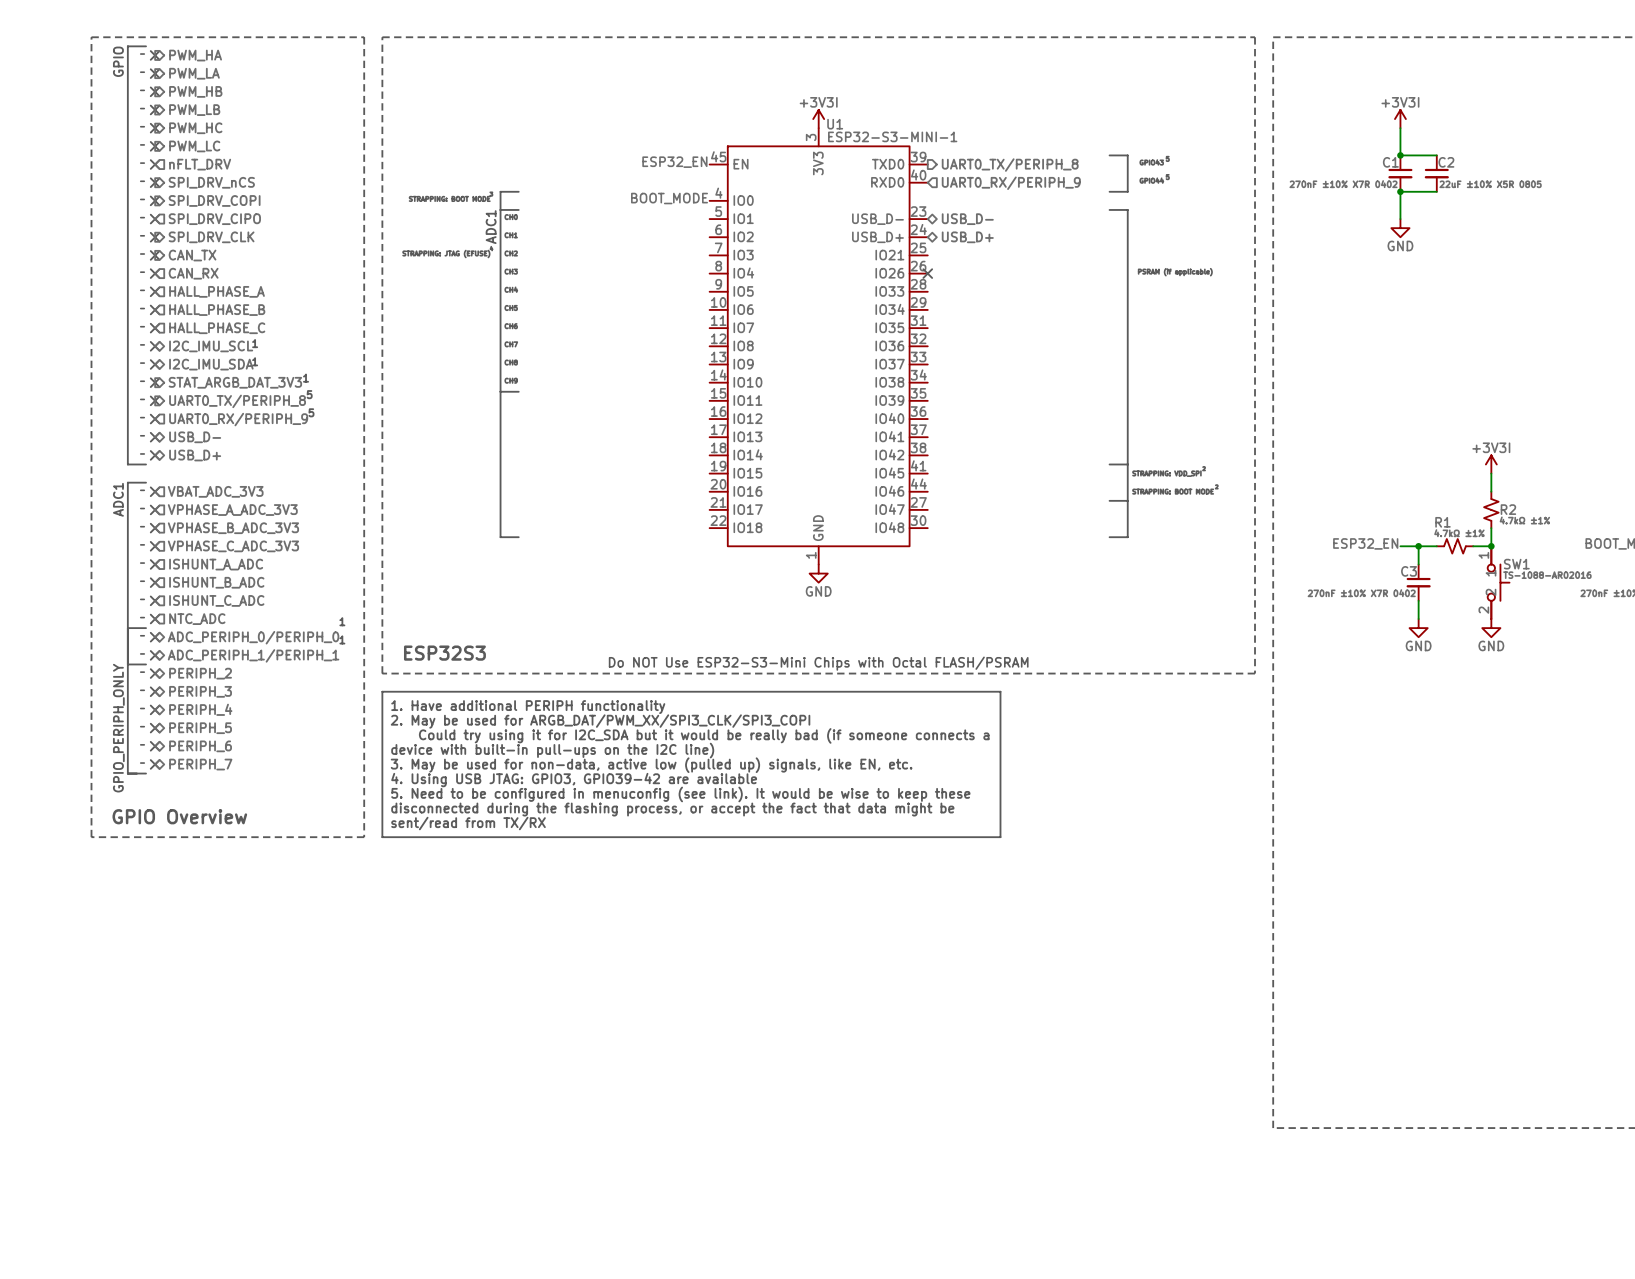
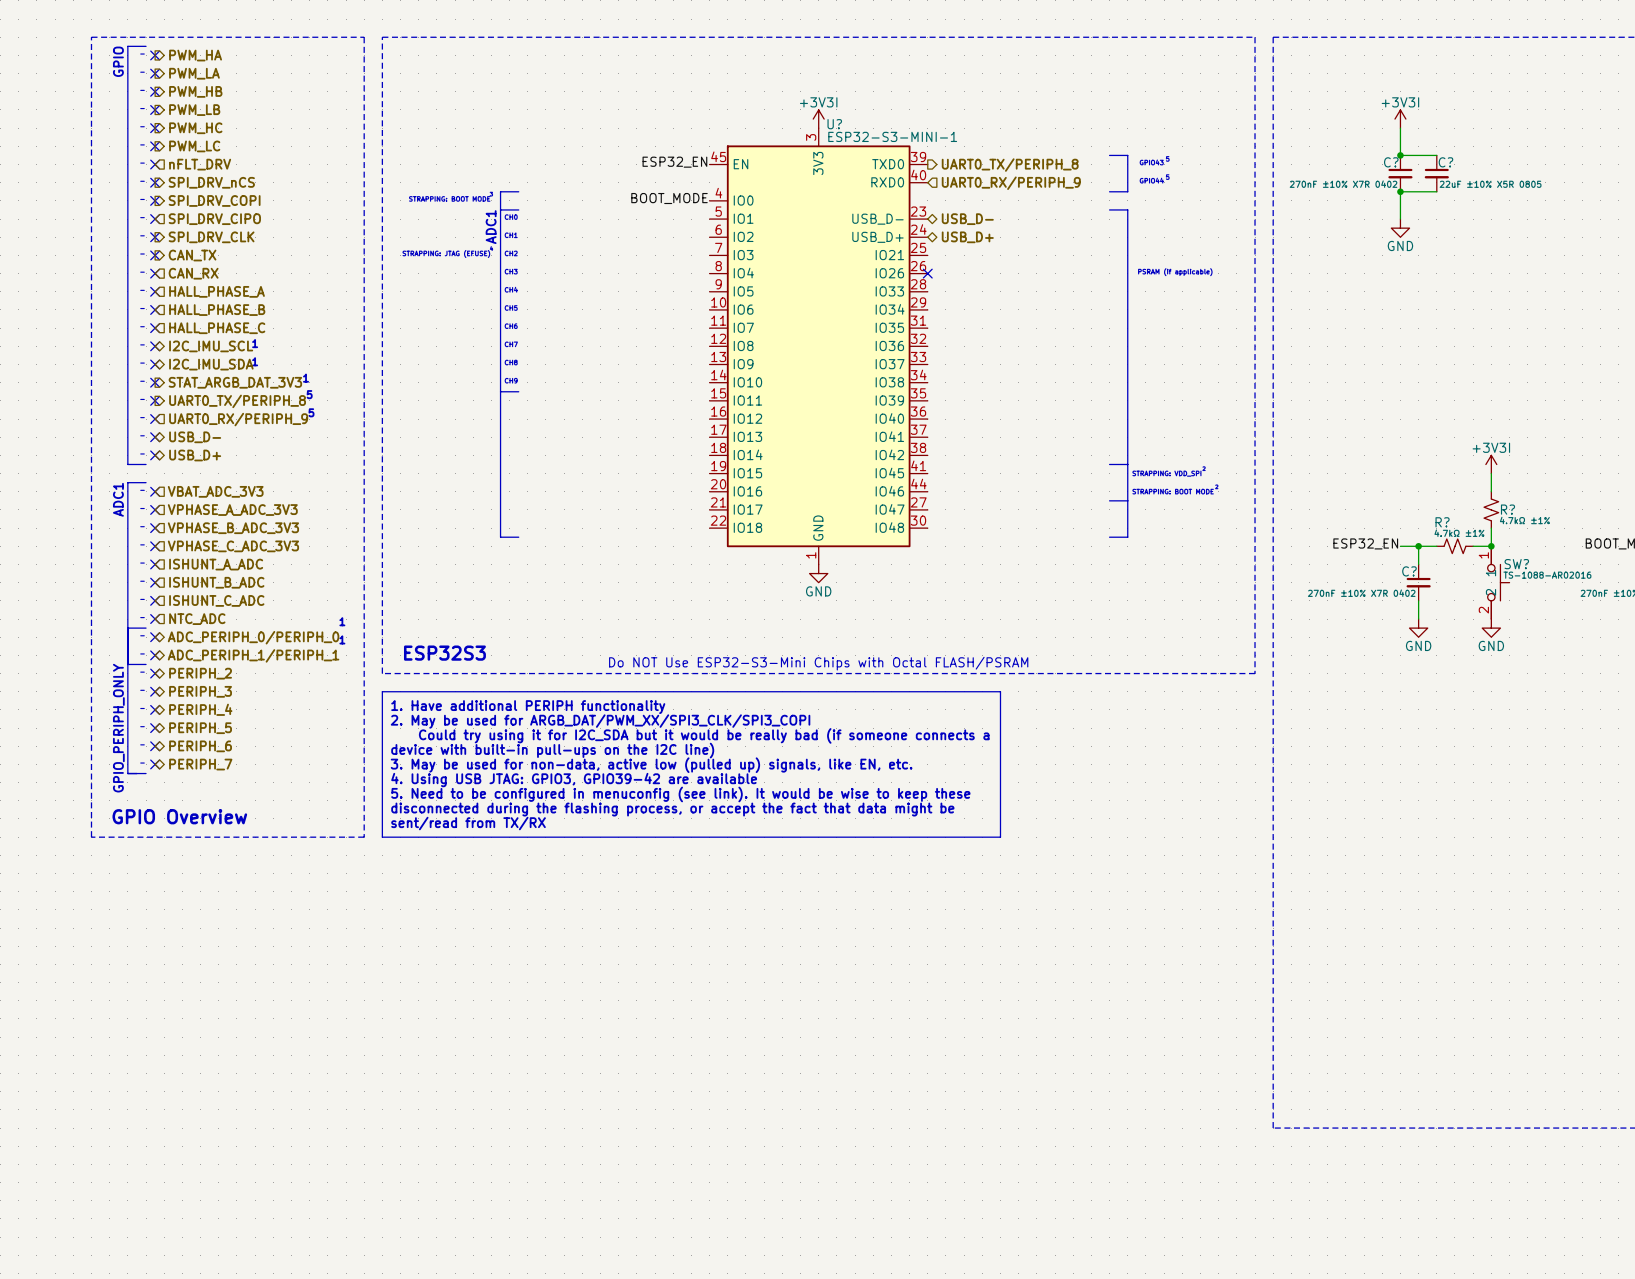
U1 name: U1 (835, 124) -> U? (834, 124)
C1 name: C1 (1390, 162) -> C? (1391, 162)
C2 name: C2 (1446, 162) -> C? (1445, 162)
R2 name: R2 (1508, 509) -> R? (1507, 509)
R1 name: R1 (1442, 522) -> R? (1442, 522)
SW1 name: SW1 (1516, 564) -> SW? (1516, 564)
C3 name: C3 (1409, 571) -> C? (1409, 571)

